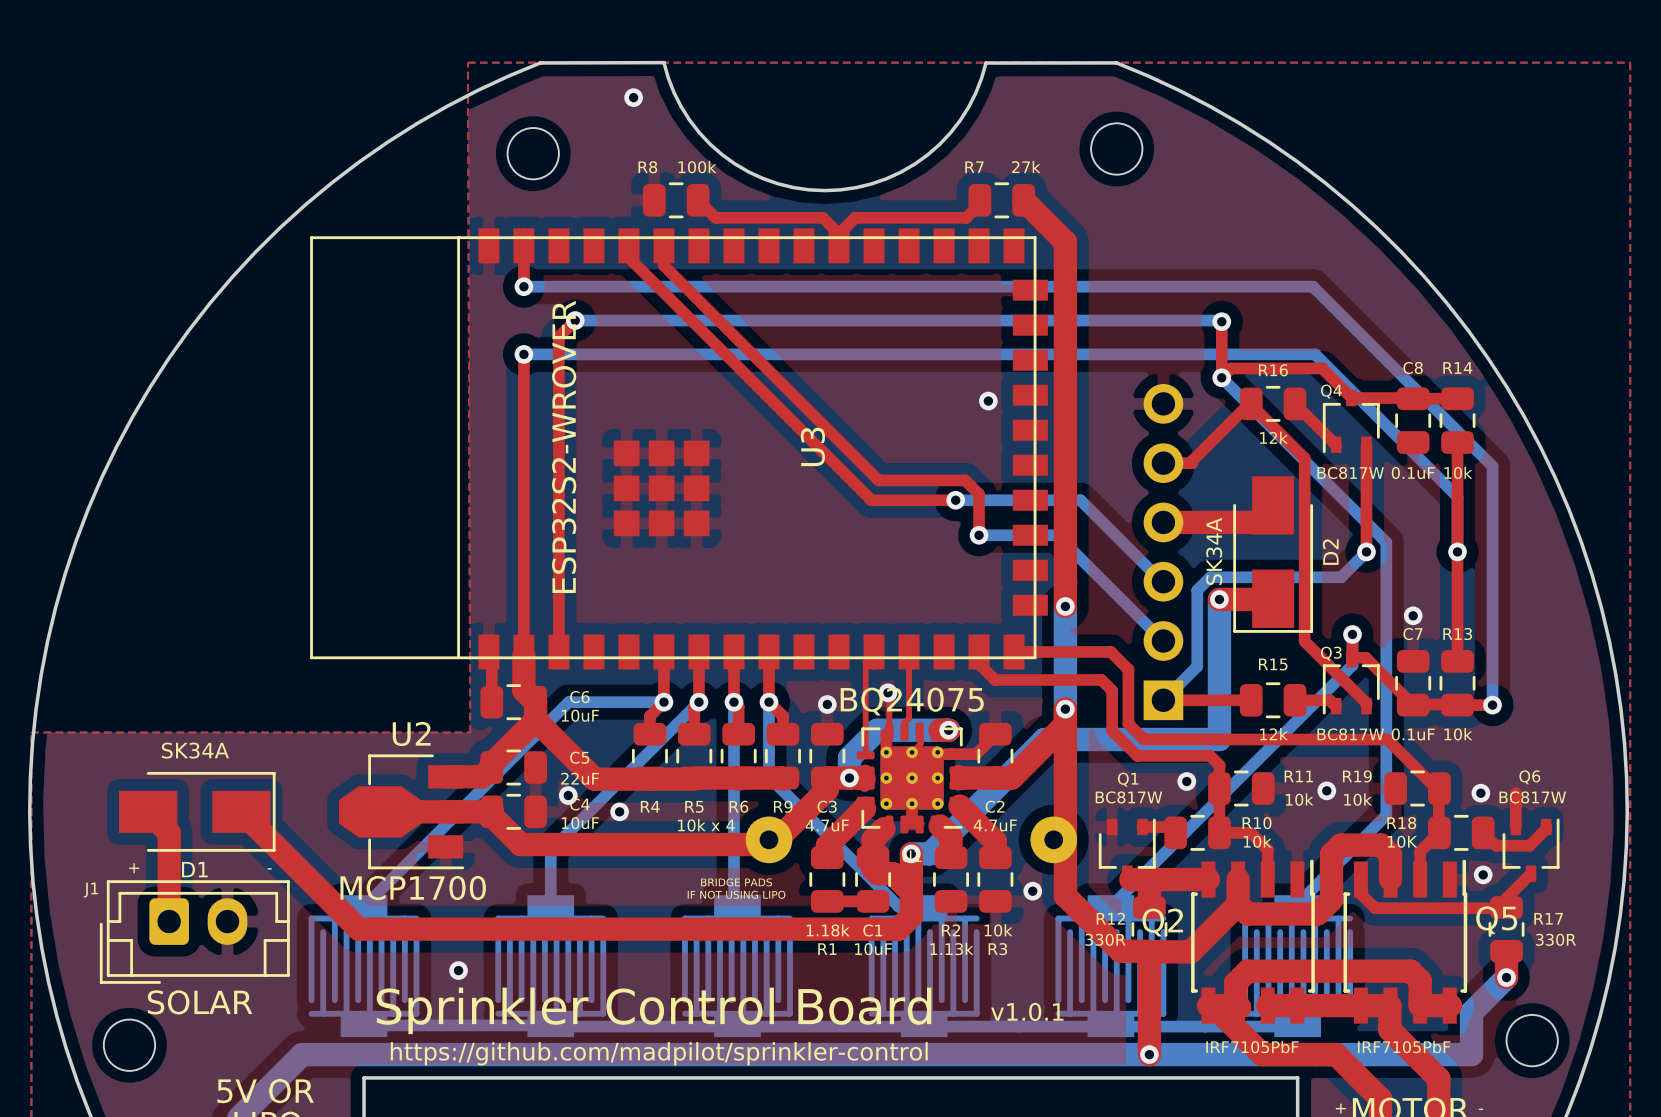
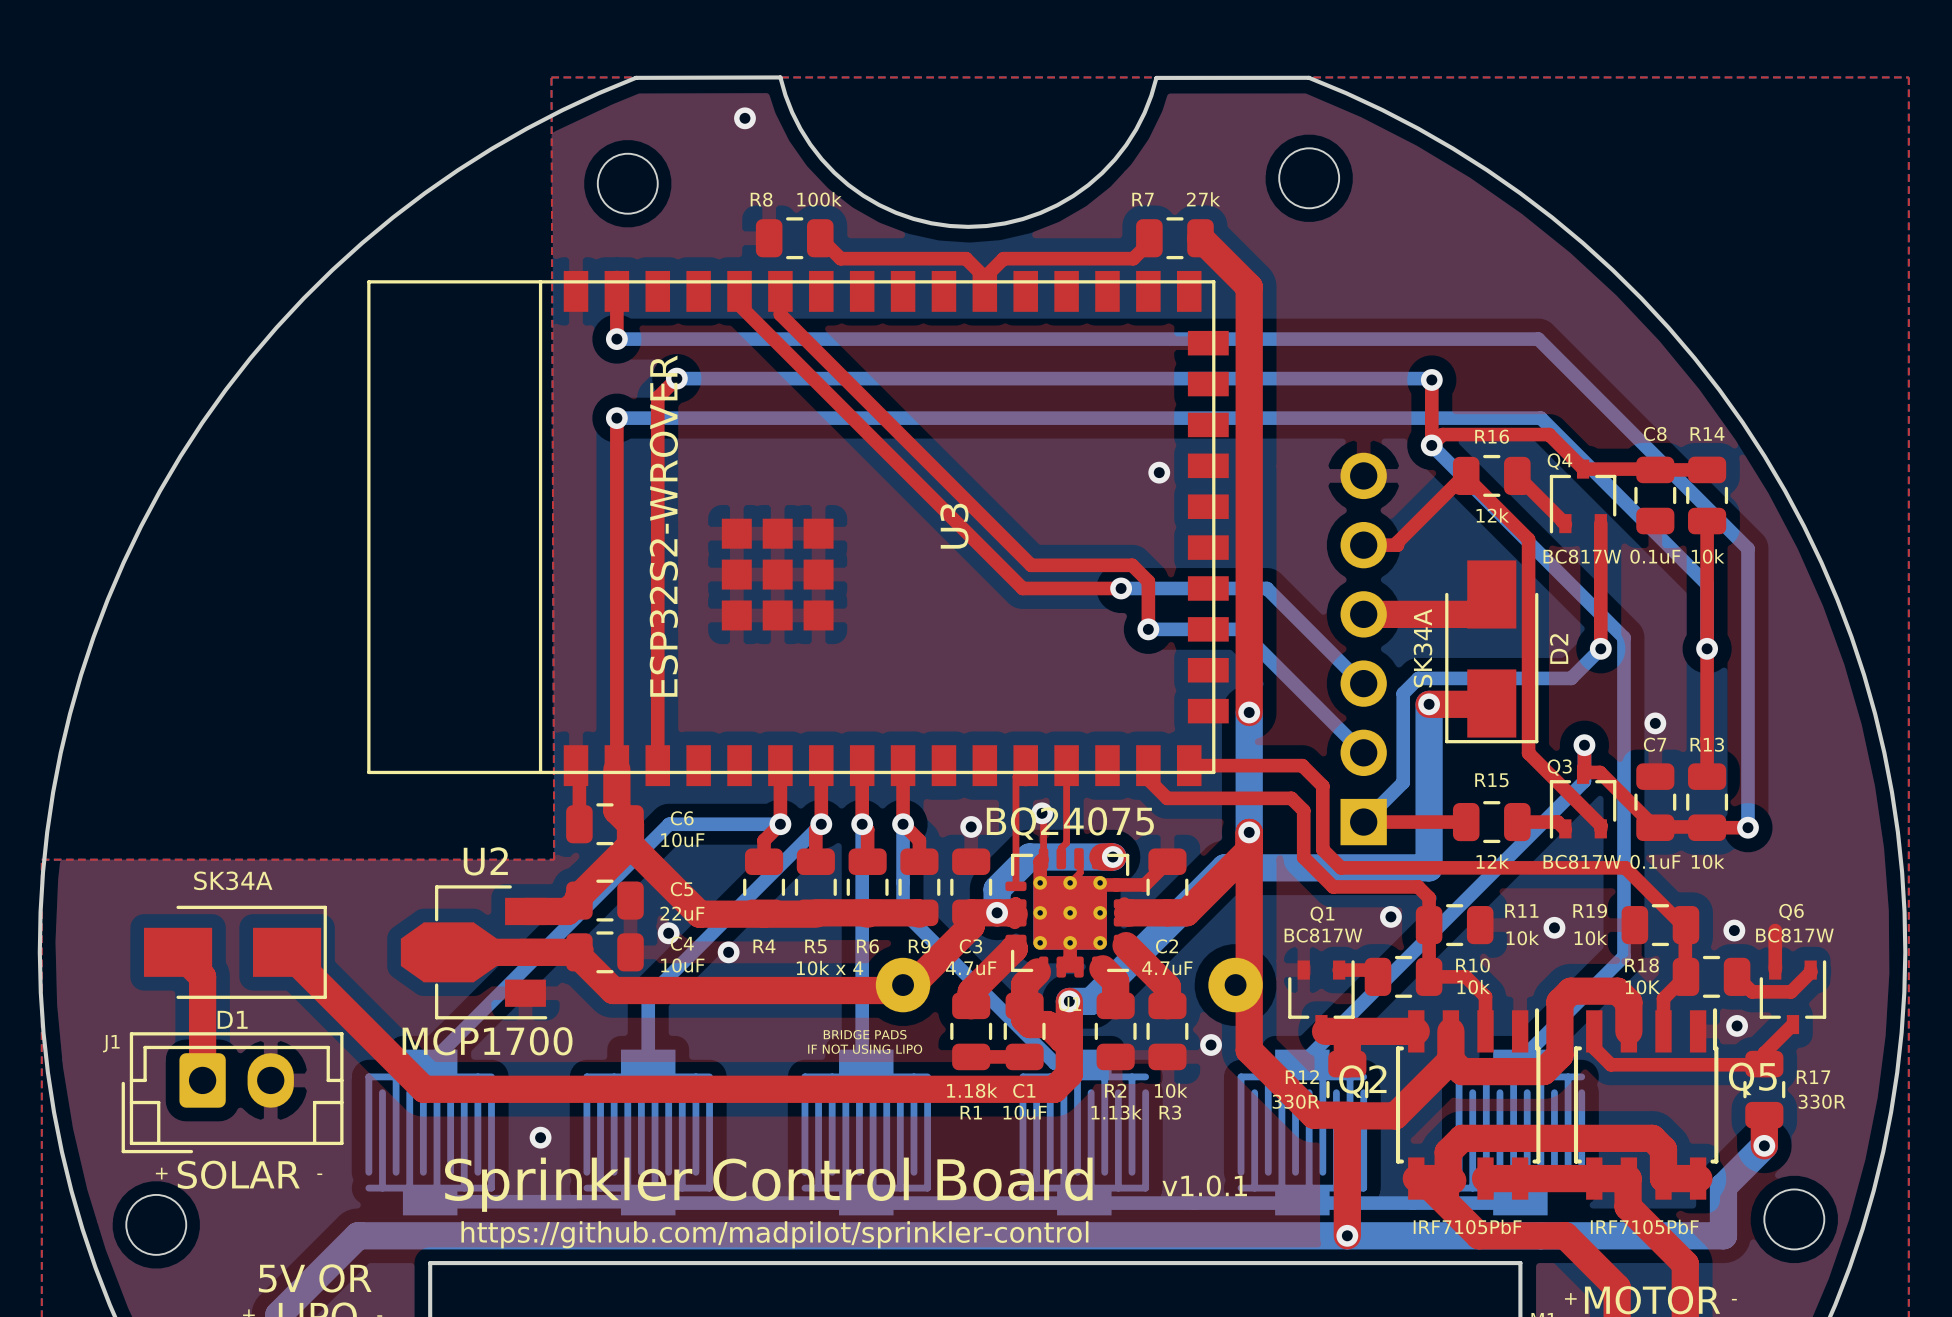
text position: + (134, 868) -> + (161, 1173)
text position: - (269, 868) -> - (319, 1174)

